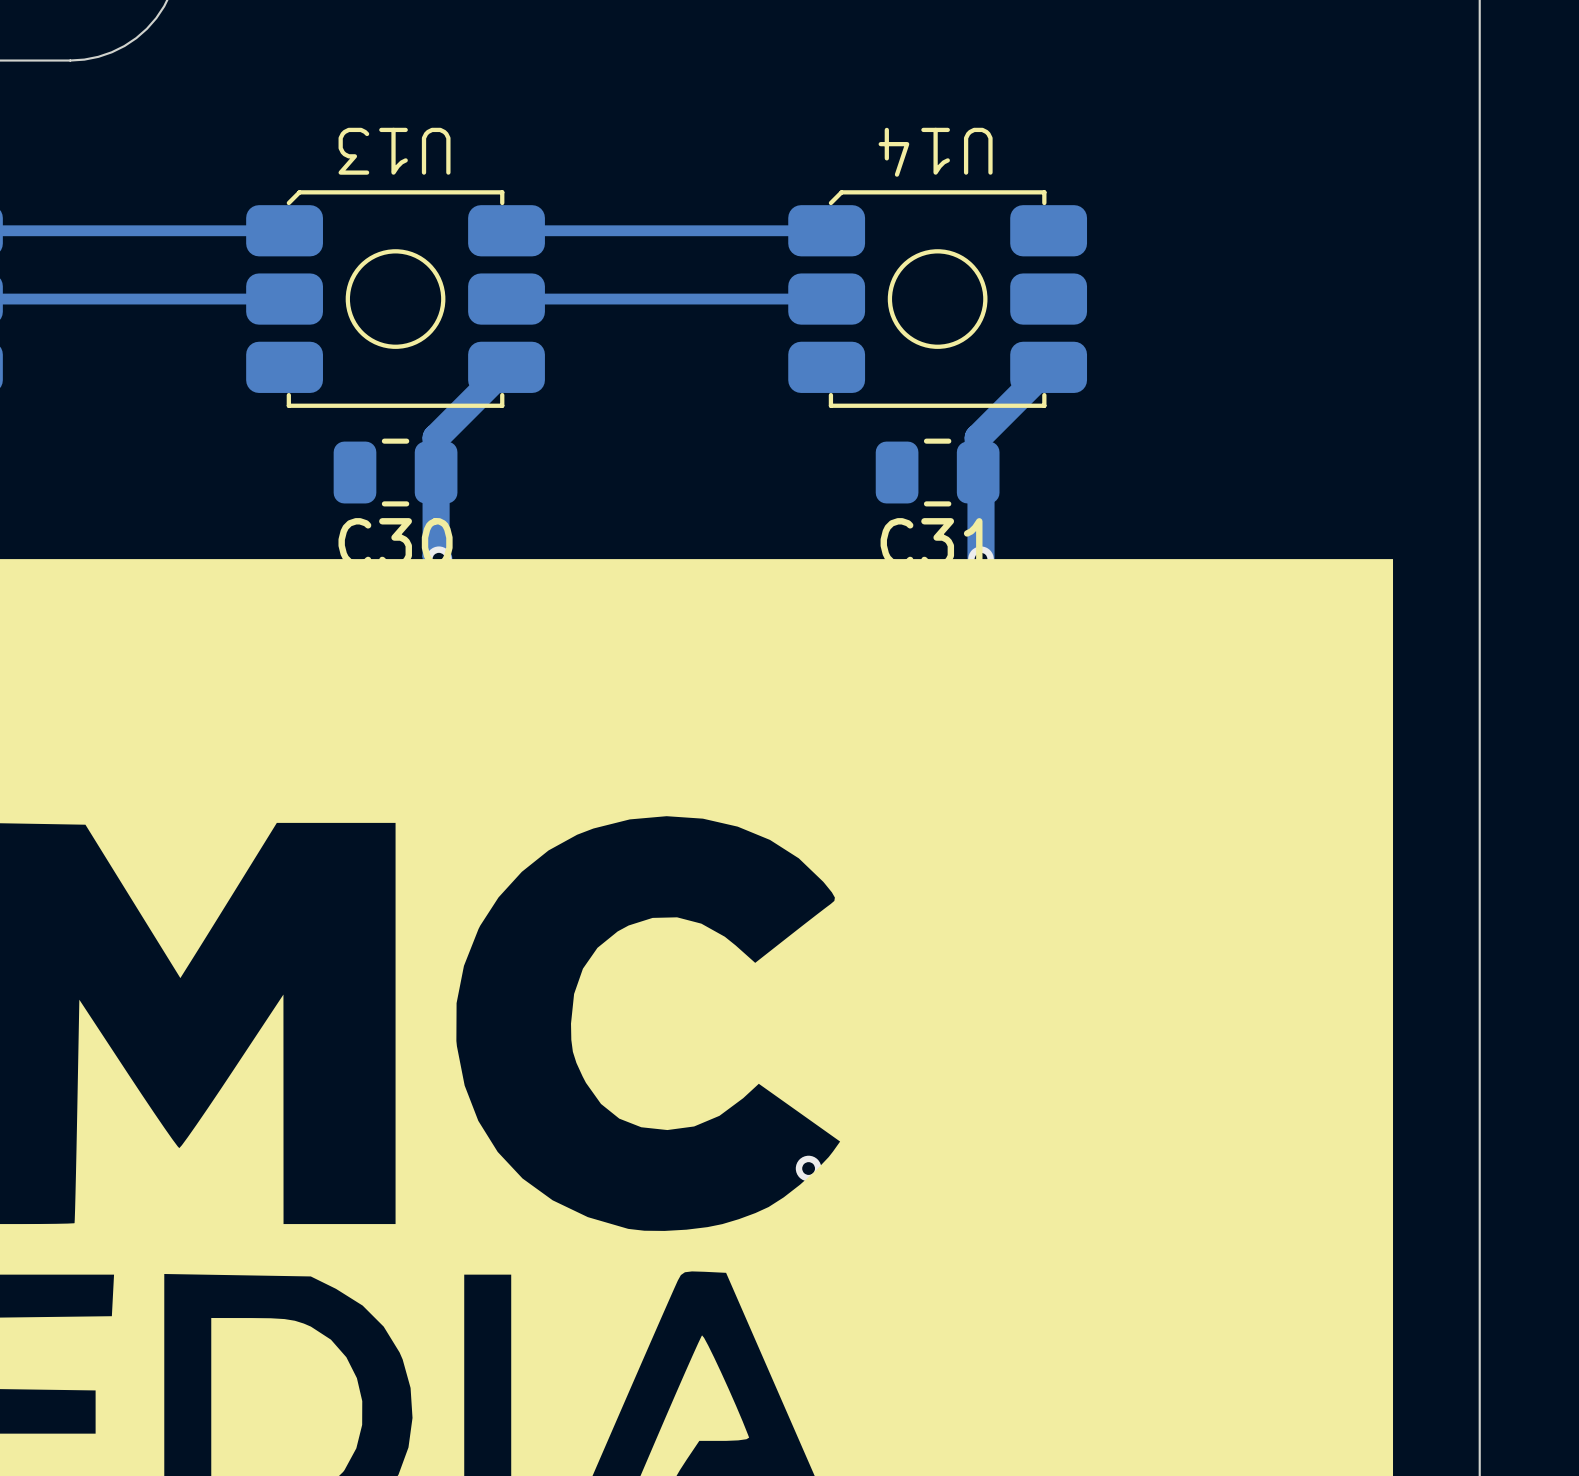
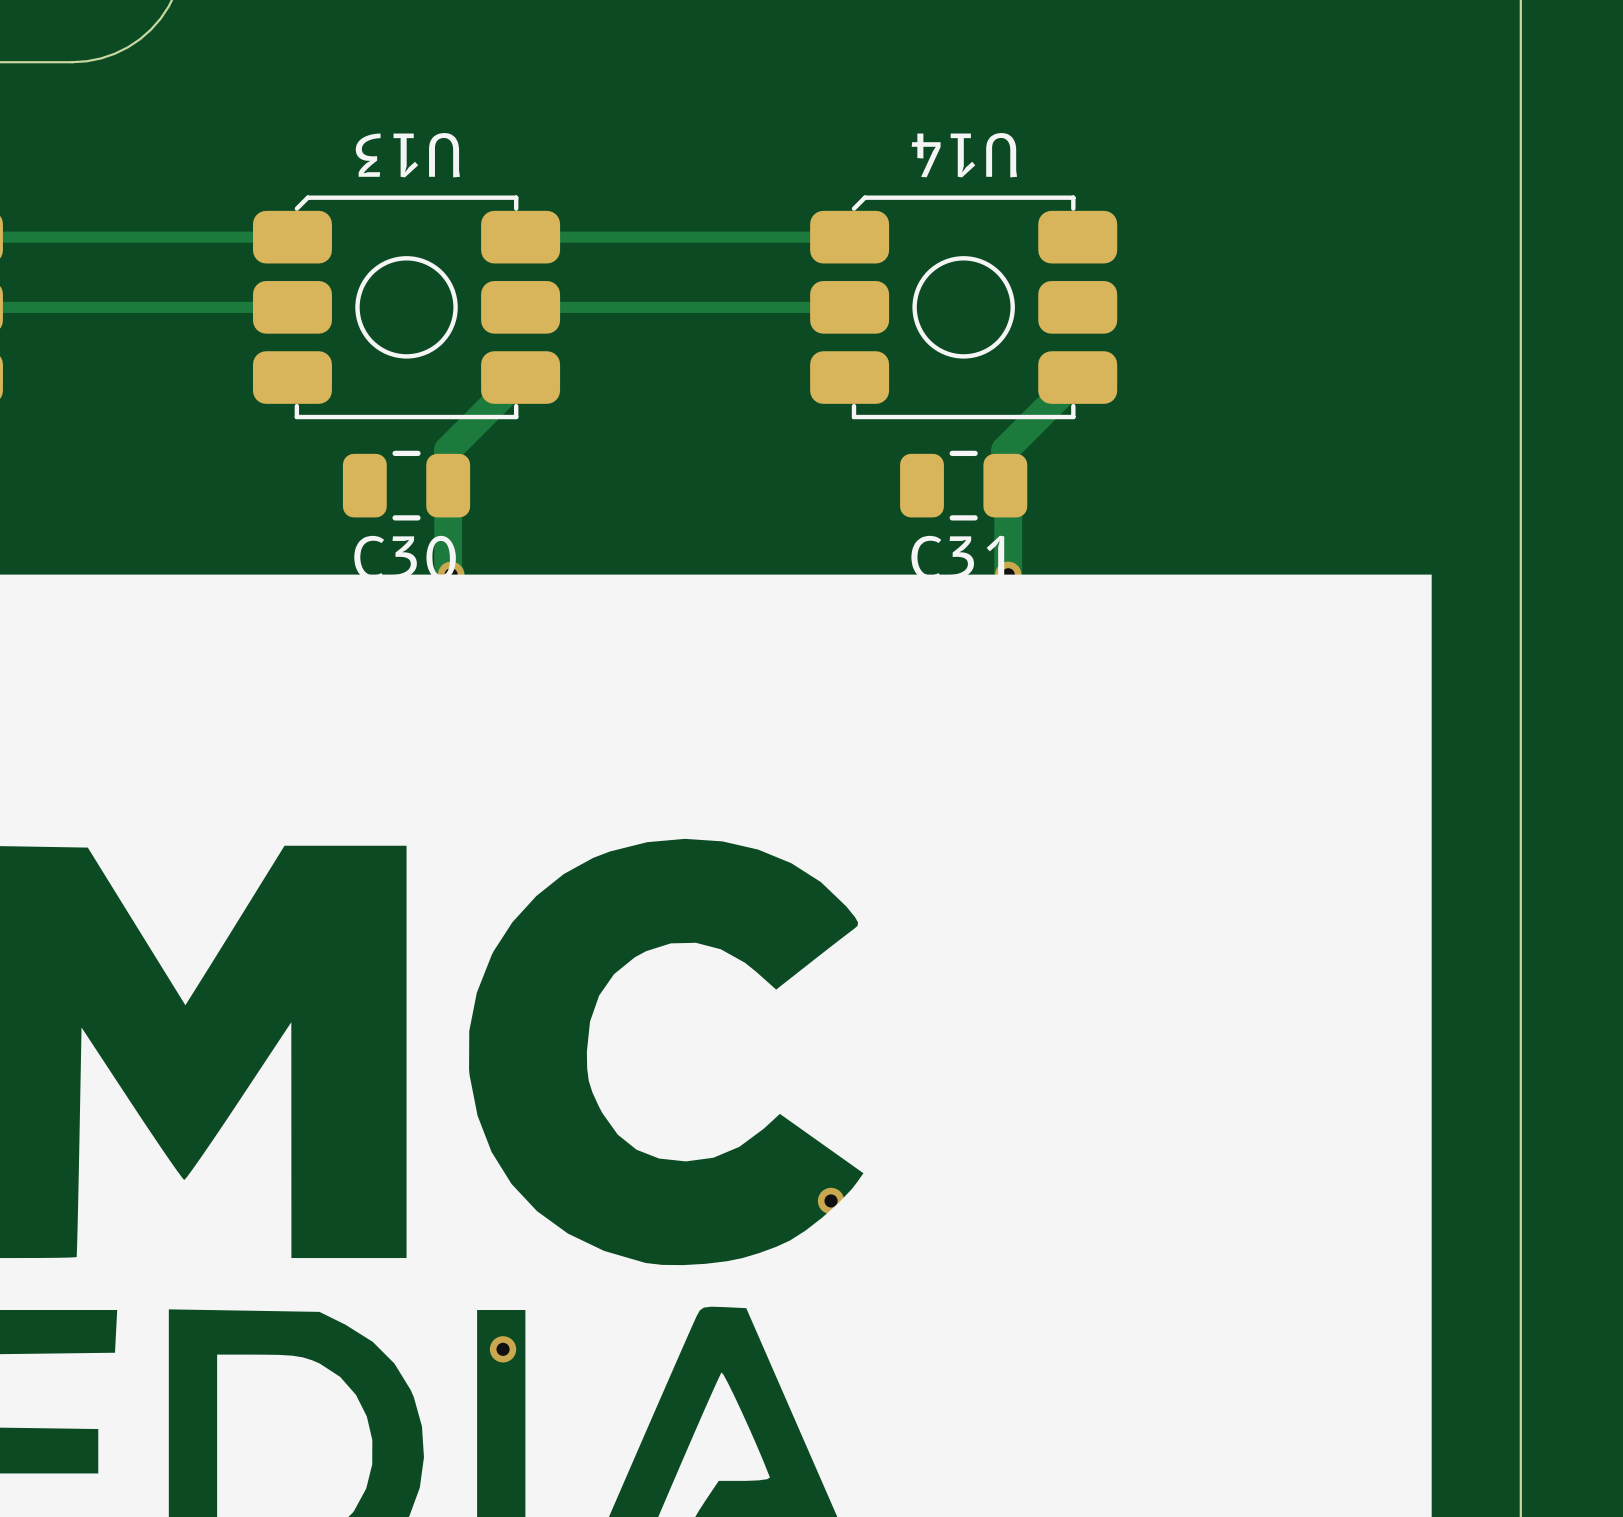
via: none -> (503, 1349)

